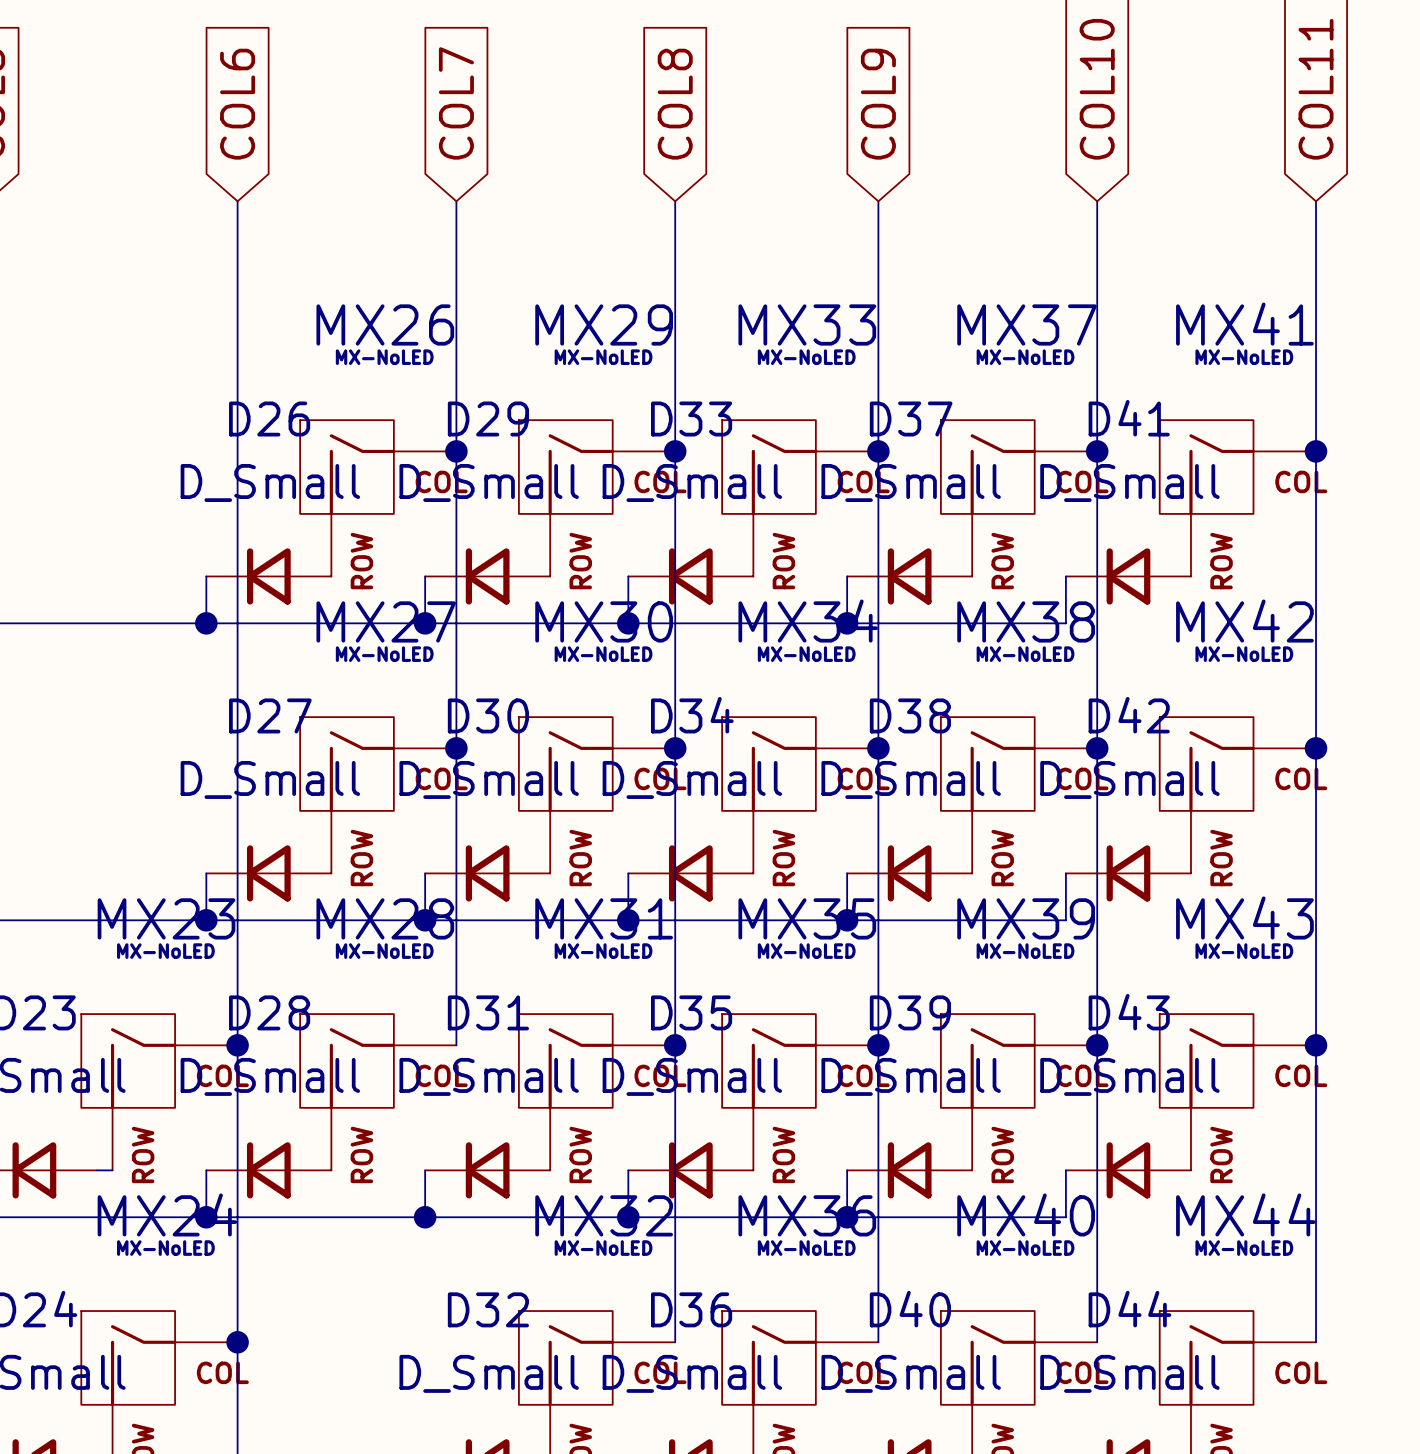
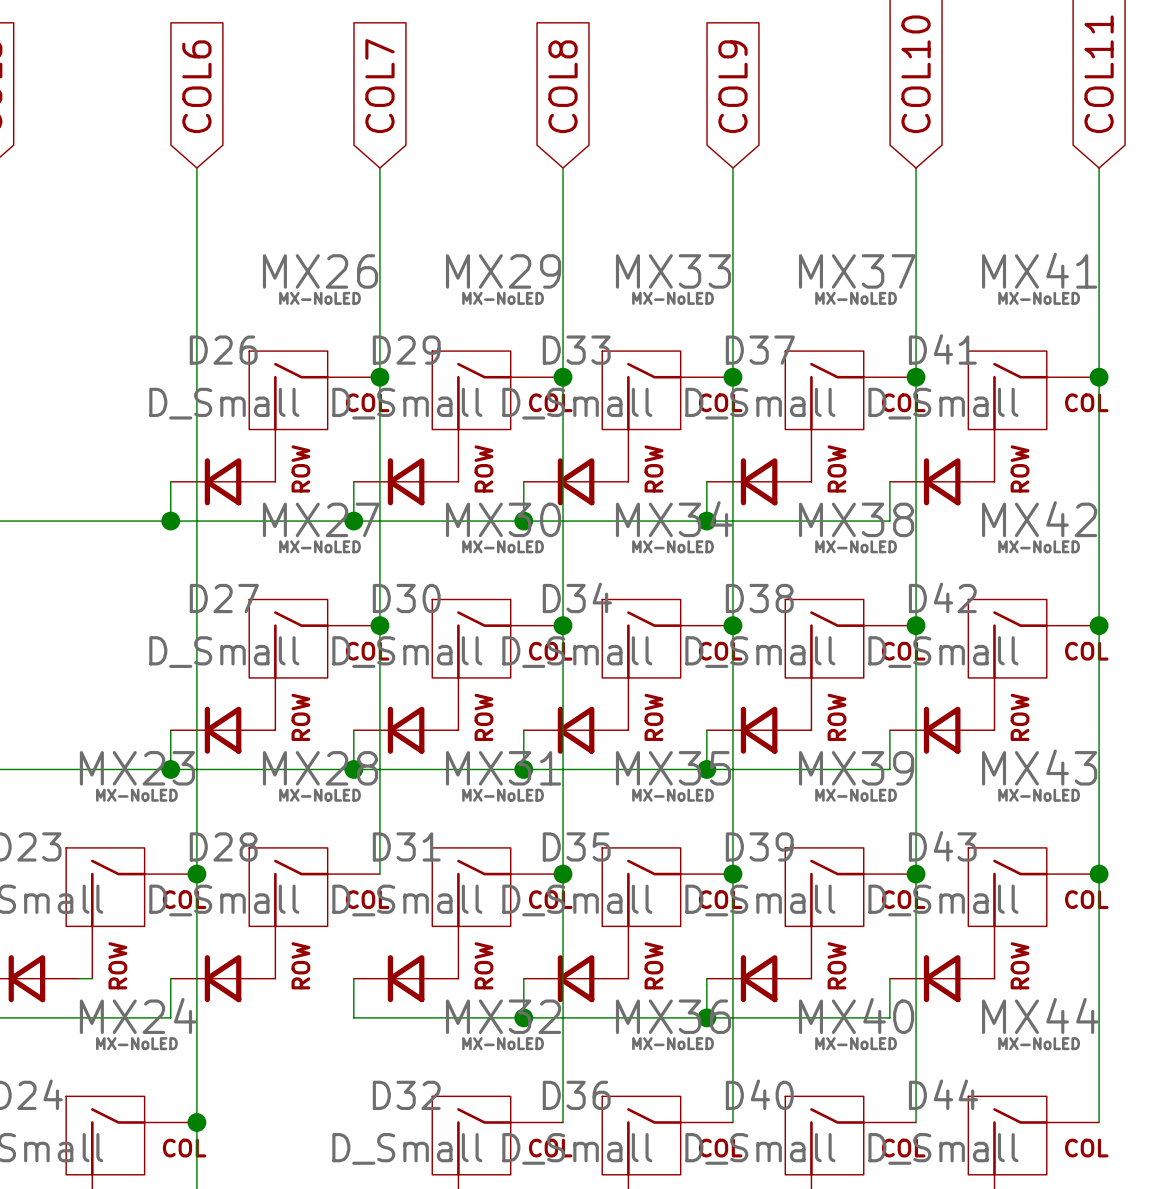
wire: (206, 1217) (425, 1217) -> none
junction: (206, 1217) -> none
junction: (425, 1217) -> none

